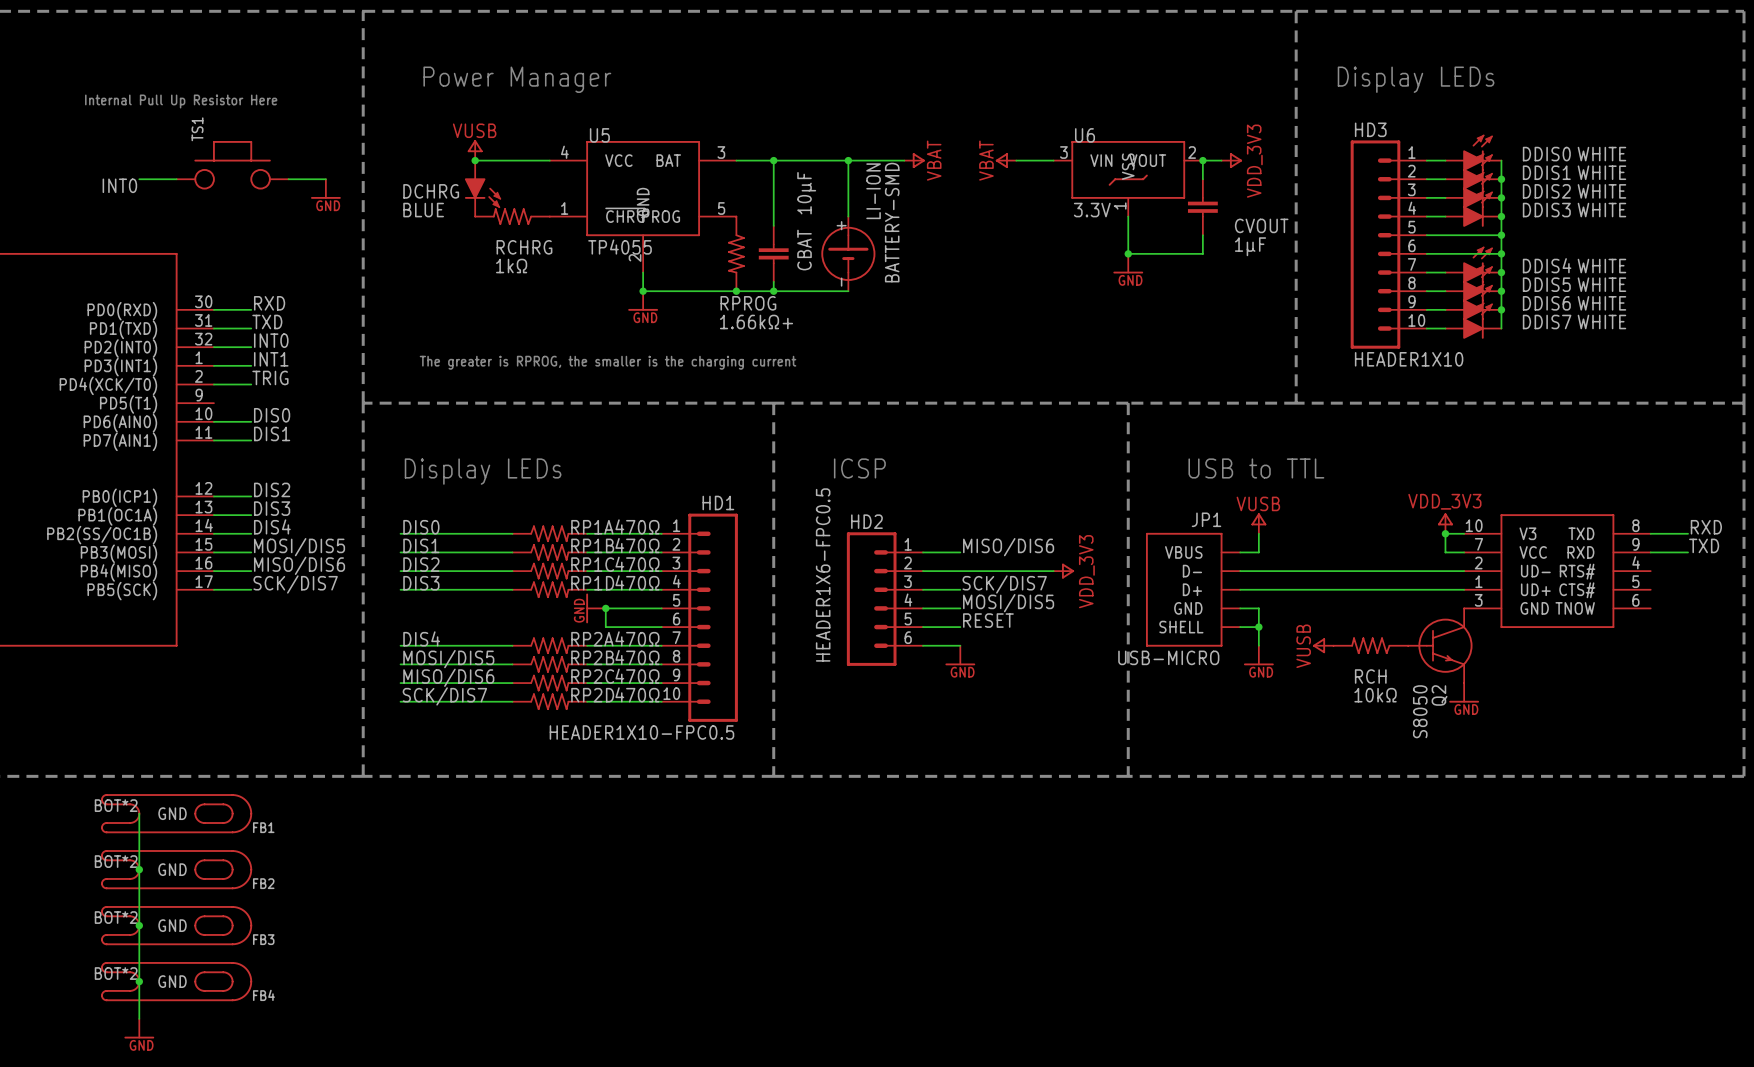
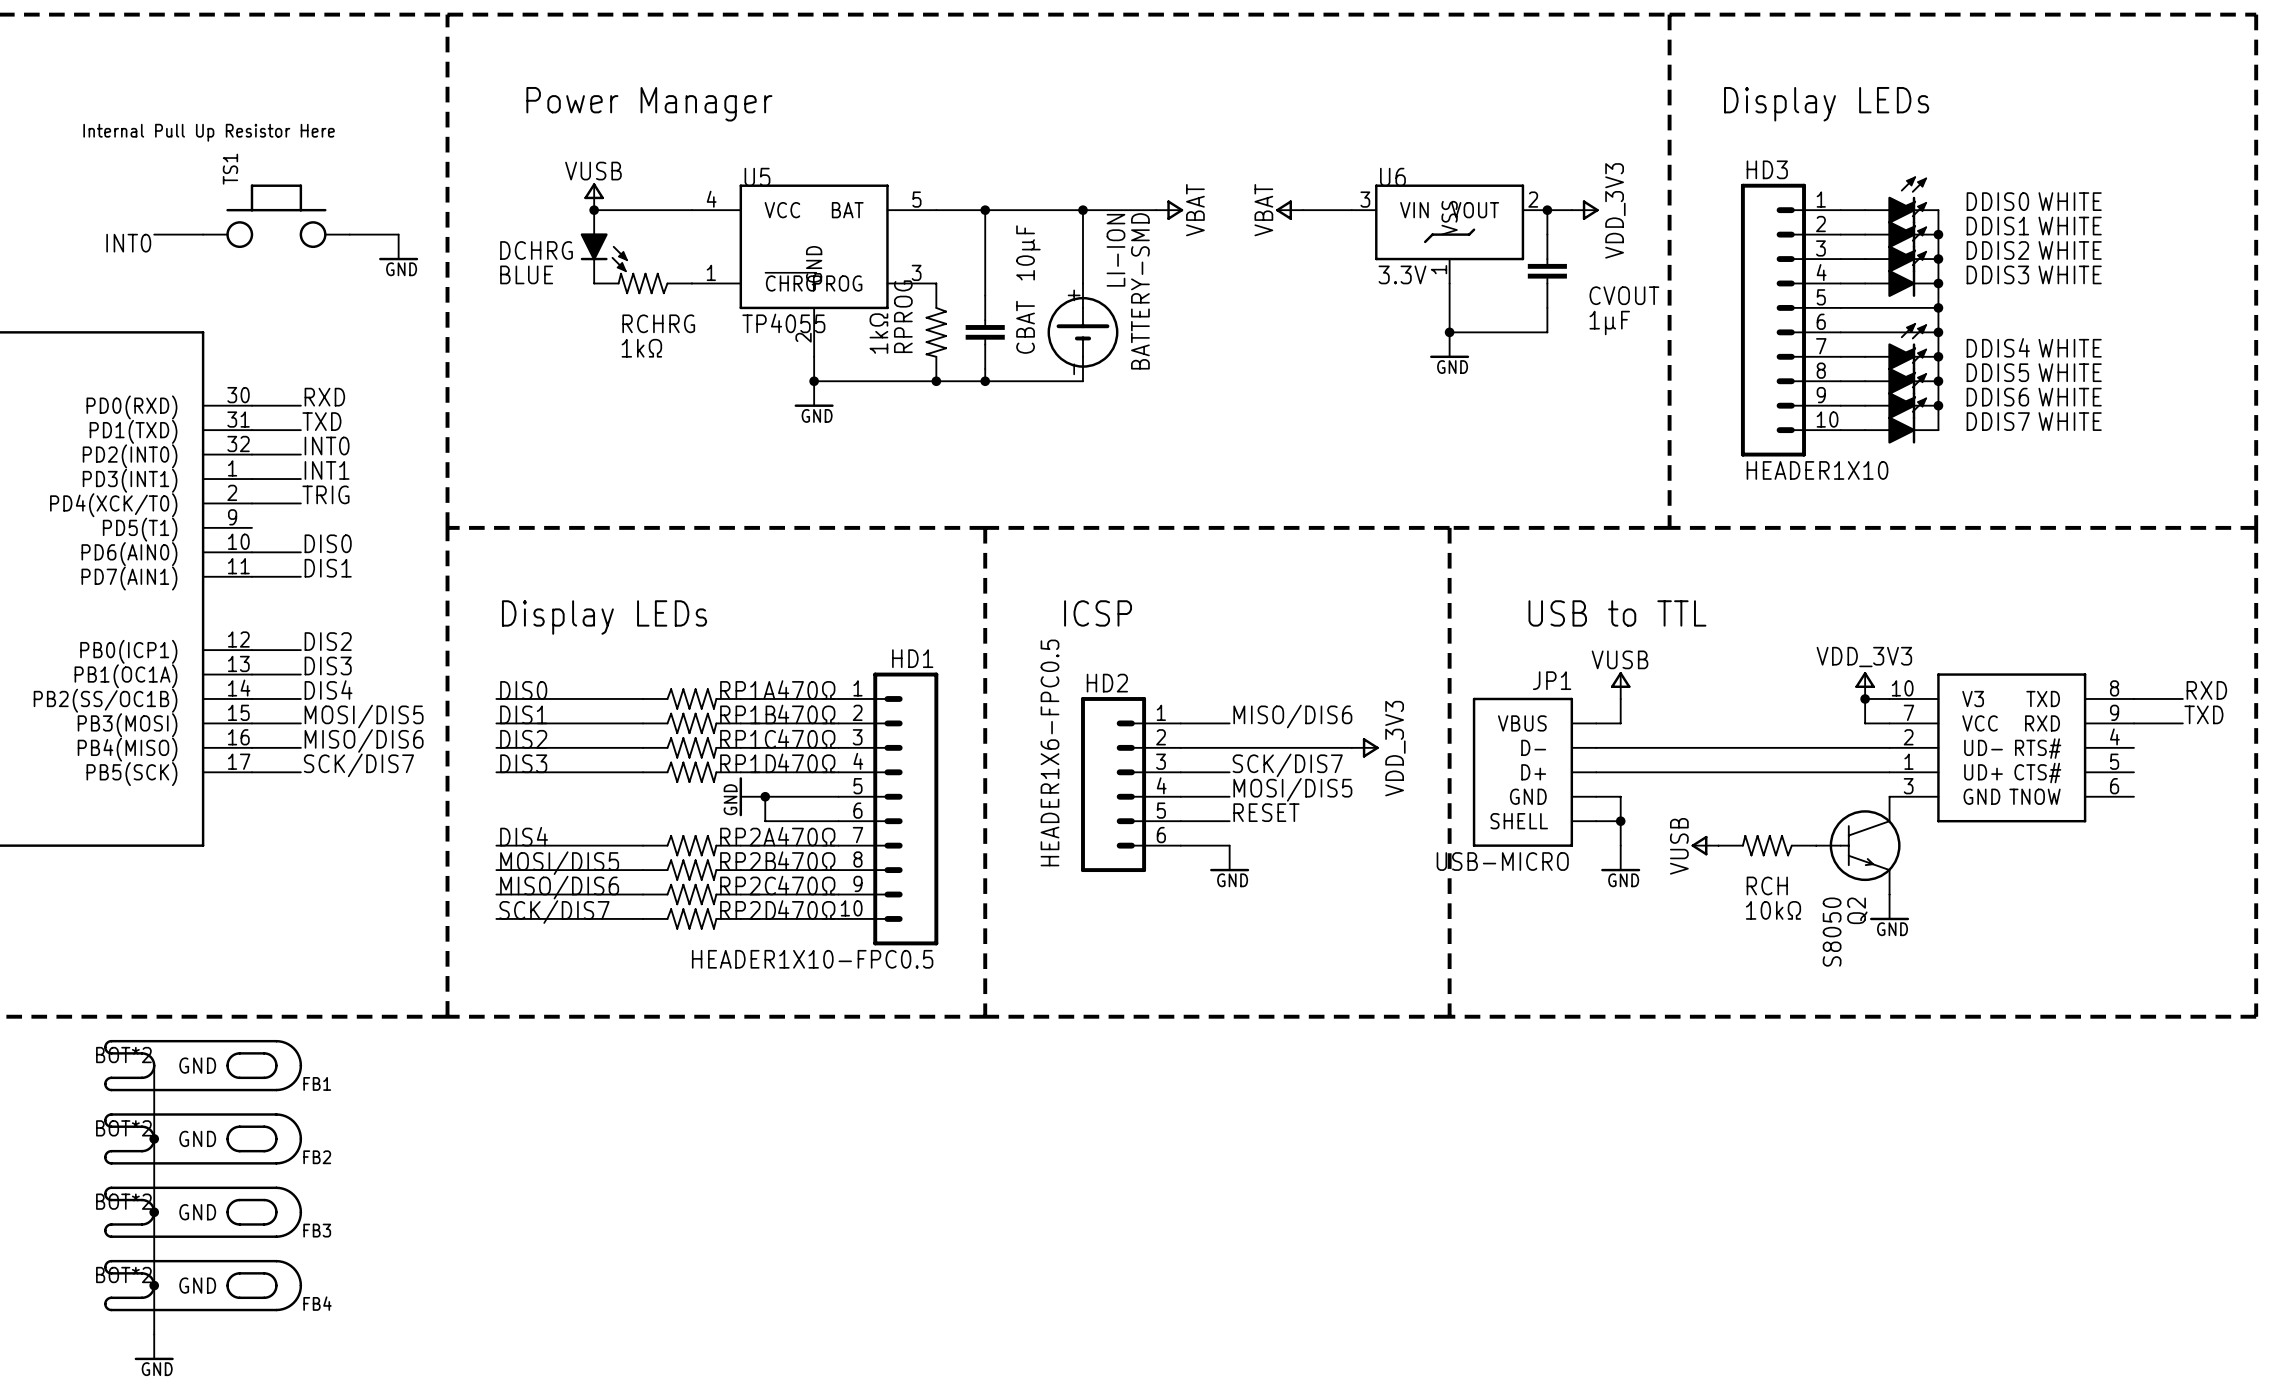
U5 pin number: 3 (721, 152) -> 5 (916, 199)
U5 pin number: 5 (721, 208) -> 3 (916, 272)
RPROG name rotation: 0° (748, 303) -> 90° counterclockwise (903, 316)
RPROG name position: RPROG (748, 303) -> RPROG (903, 316)
RPROG value: 1.66kΩ+ (756, 322) -> 1kΩ (878, 333)
text: The greater is RPROG, the smaller is the charging current (608, 362) -> none

